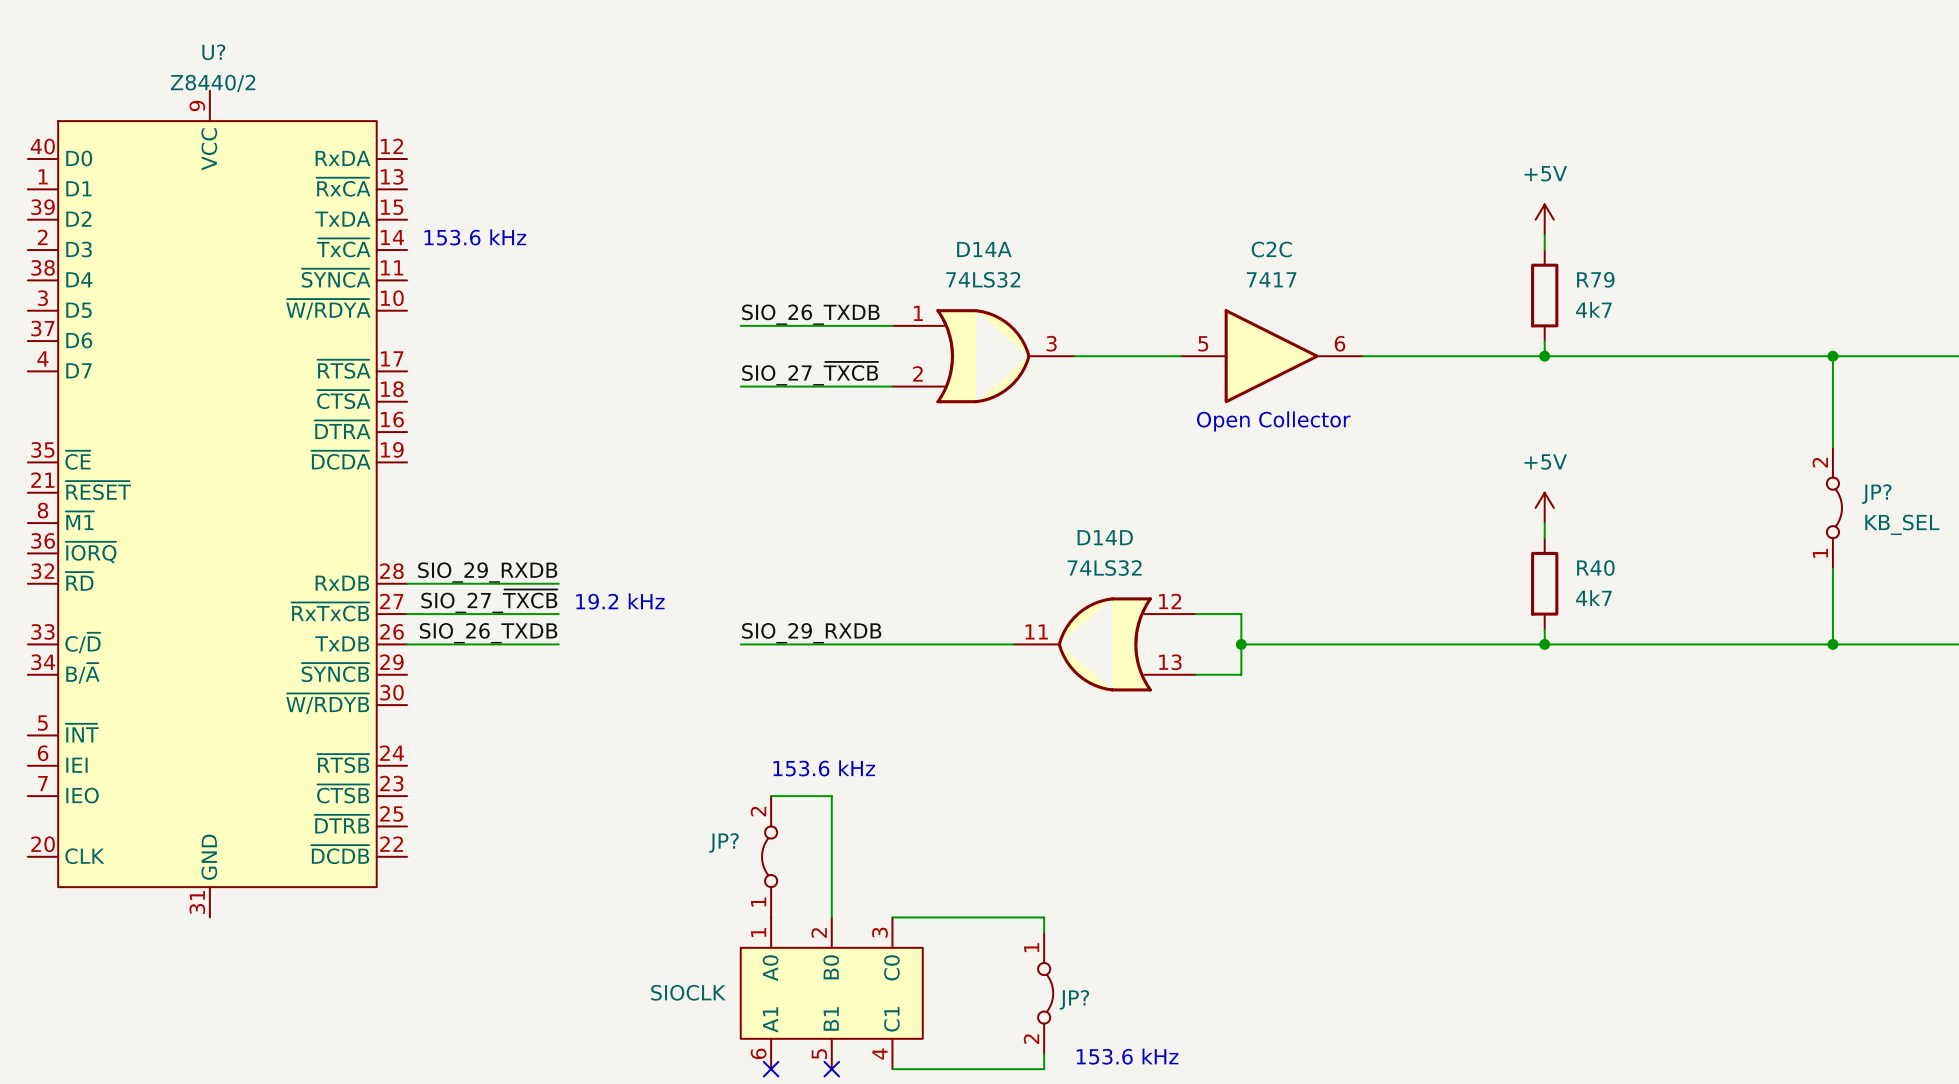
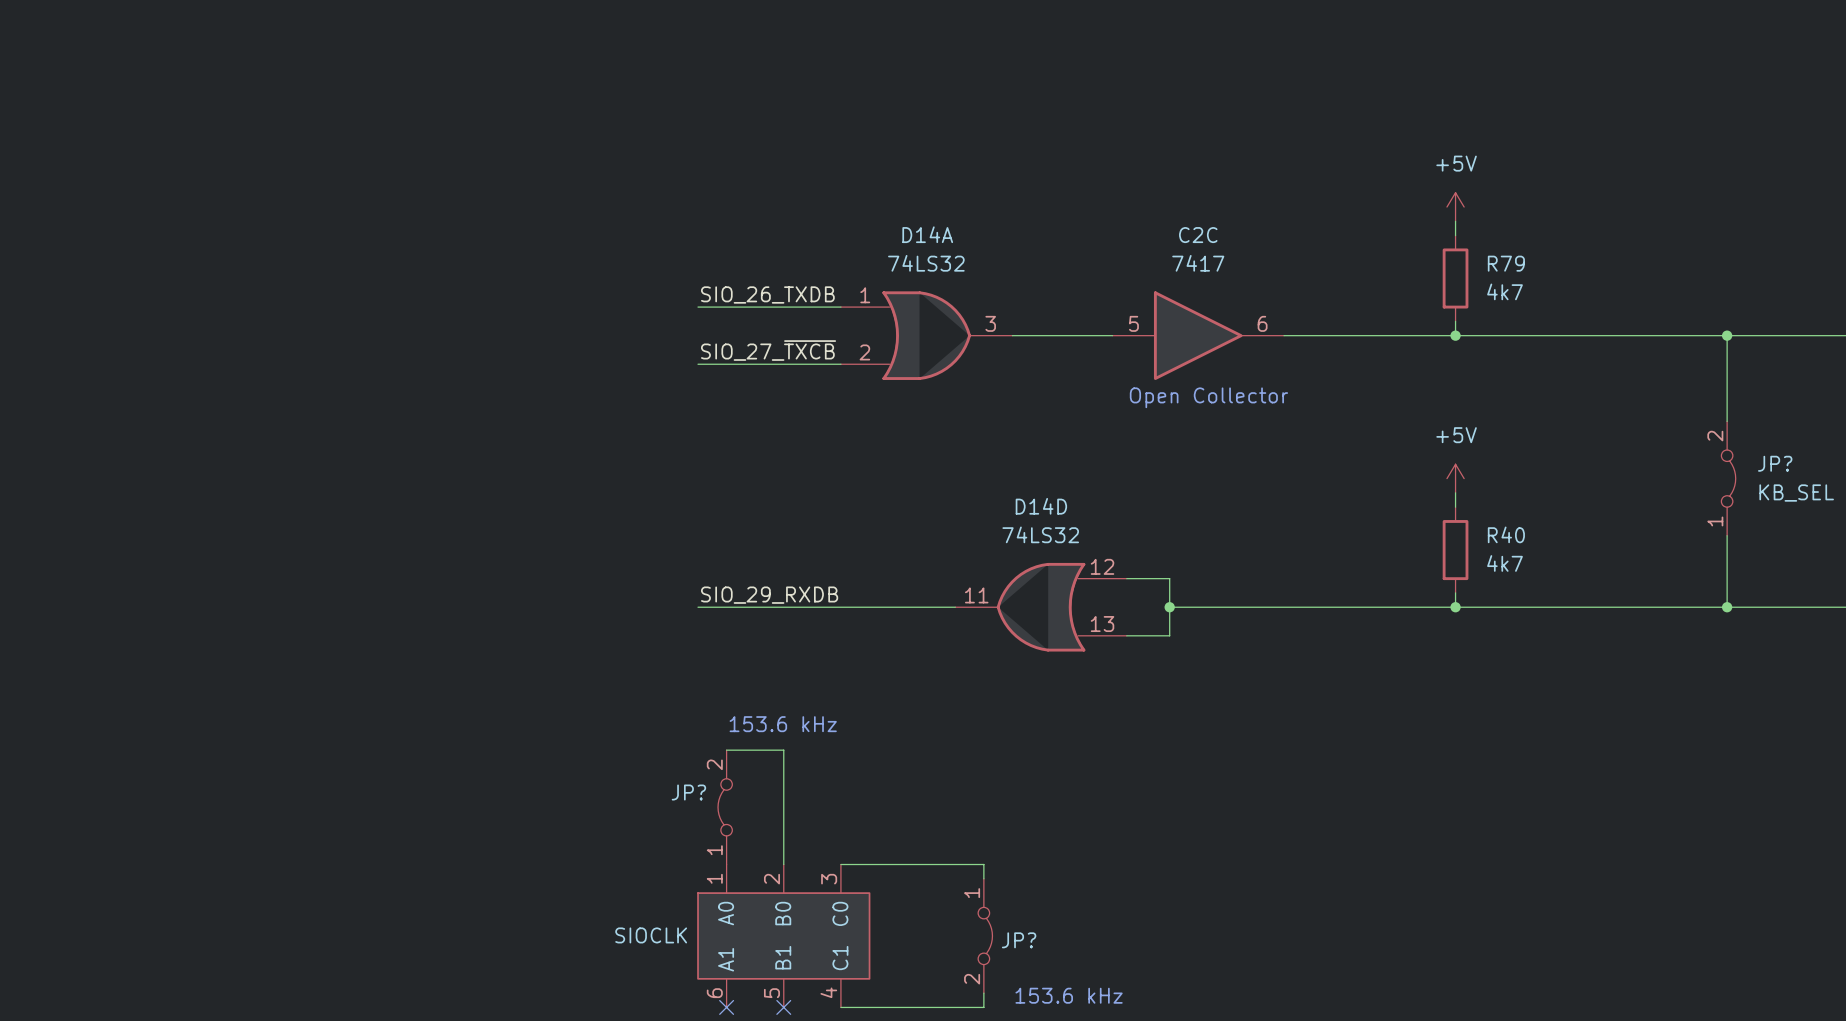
text: 153.6 kHz (475, 237) -> none
U?: Z8440/2 (217, 504) -> none
label: SIO_29_RXDB (487, 572) -> none
wire: (407, 583) (558, 583) -> none
label: SIO_27_~{TXCB} (489, 601) -> none
text: 19.2 kHz (620, 601) -> none
wire: (407, 614) (558, 614) -> none
label: SIO_26_TXDB (488, 633) -> none
wire: (407, 644) (558, 644) -> none

